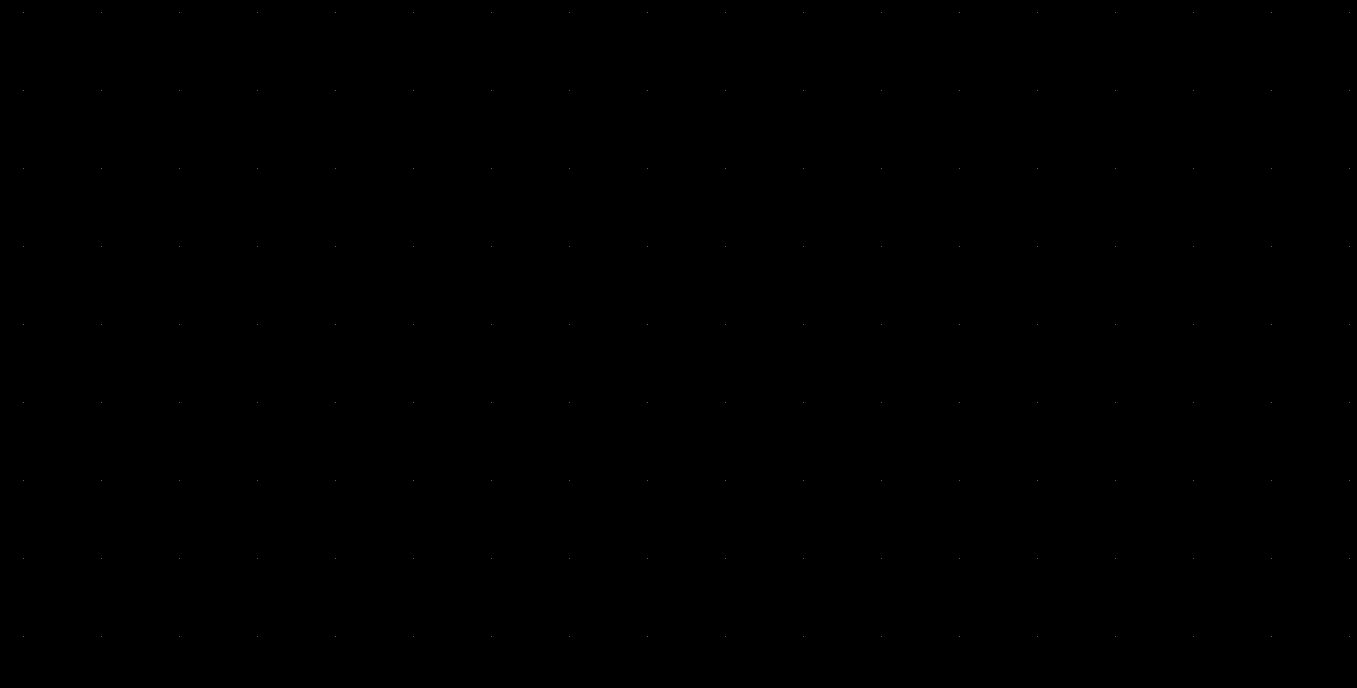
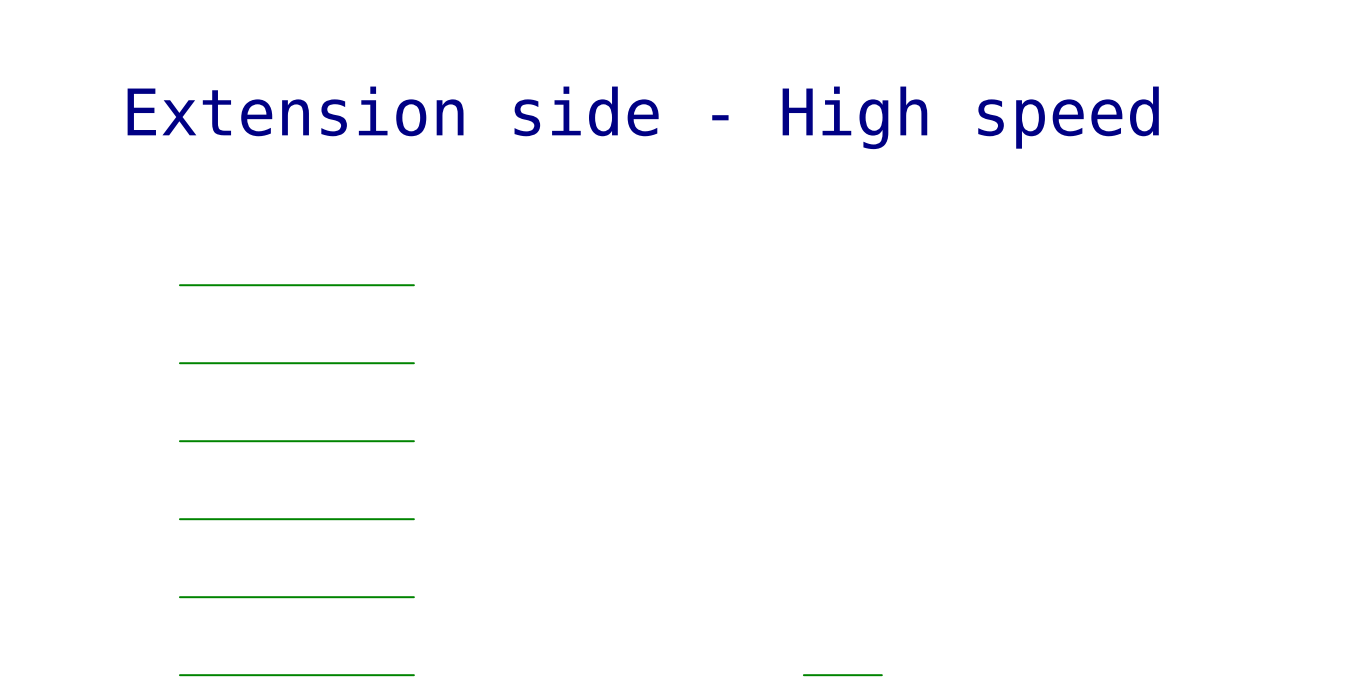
text: none -> Extension side - High speed (643, 117)
wire: none -> (179, 285) (413, 285)
wire: none -> (179, 363) (413, 363)
wire: none -> (179, 441) (413, 441)
wire: none -> (179, 519) (413, 519)
wire: none -> (179, 597) (413, 597)
wire: none -> (179, 675) (413, 675)
wire: none -> (803, 675) (881, 675)

